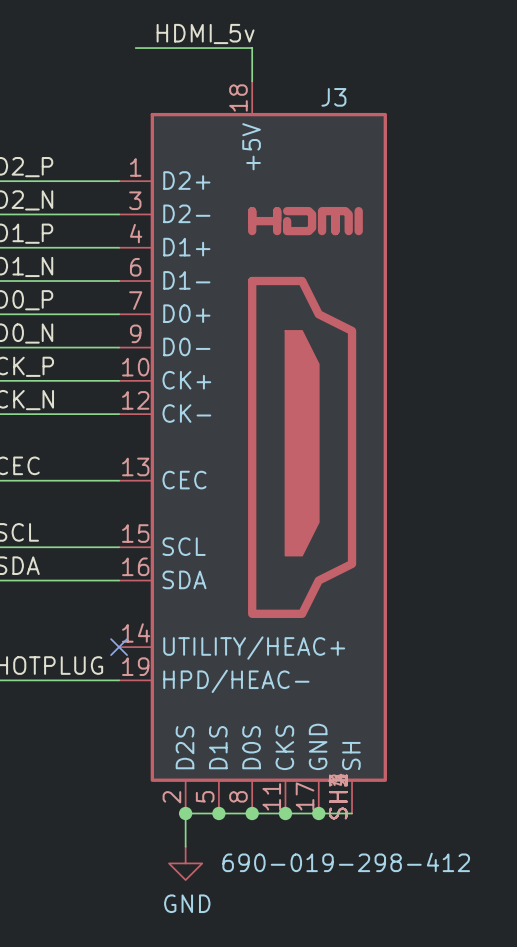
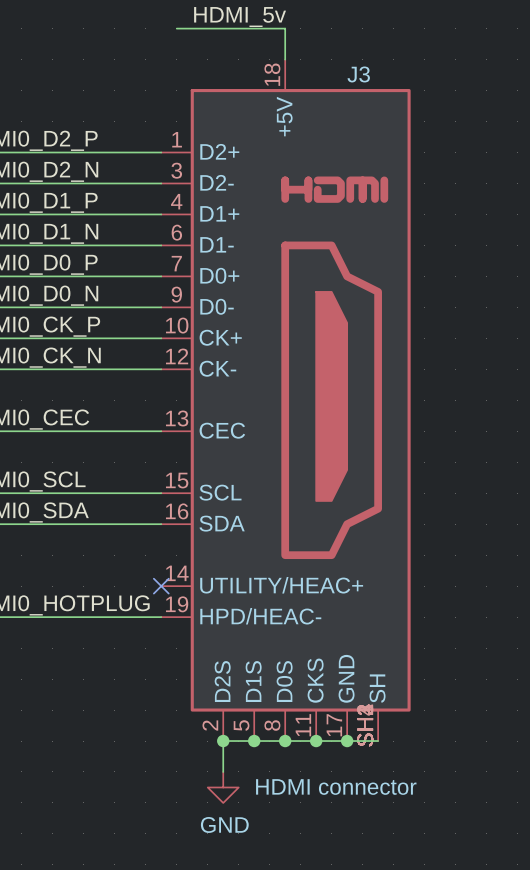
J3 value: 690-019-298-412 (346, 862) -> HDMI connector (336, 787)

